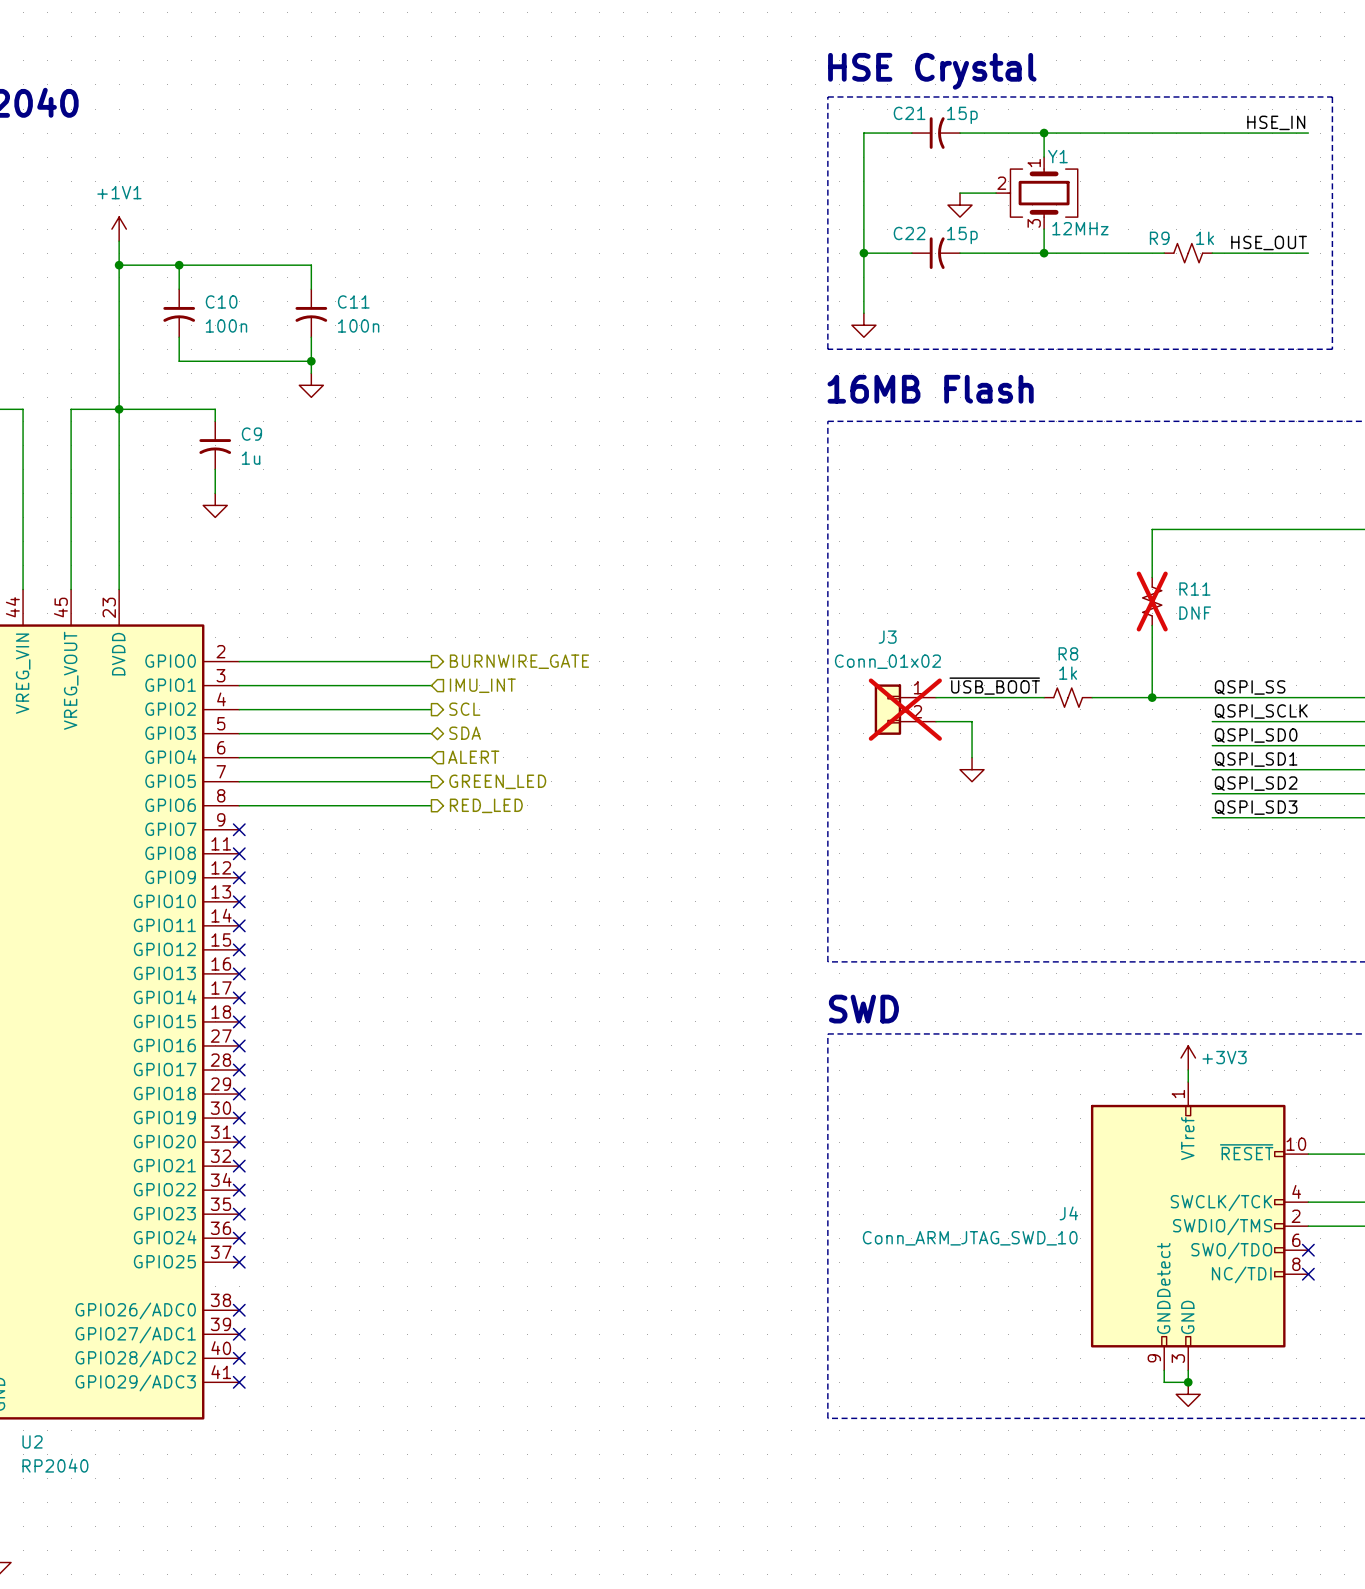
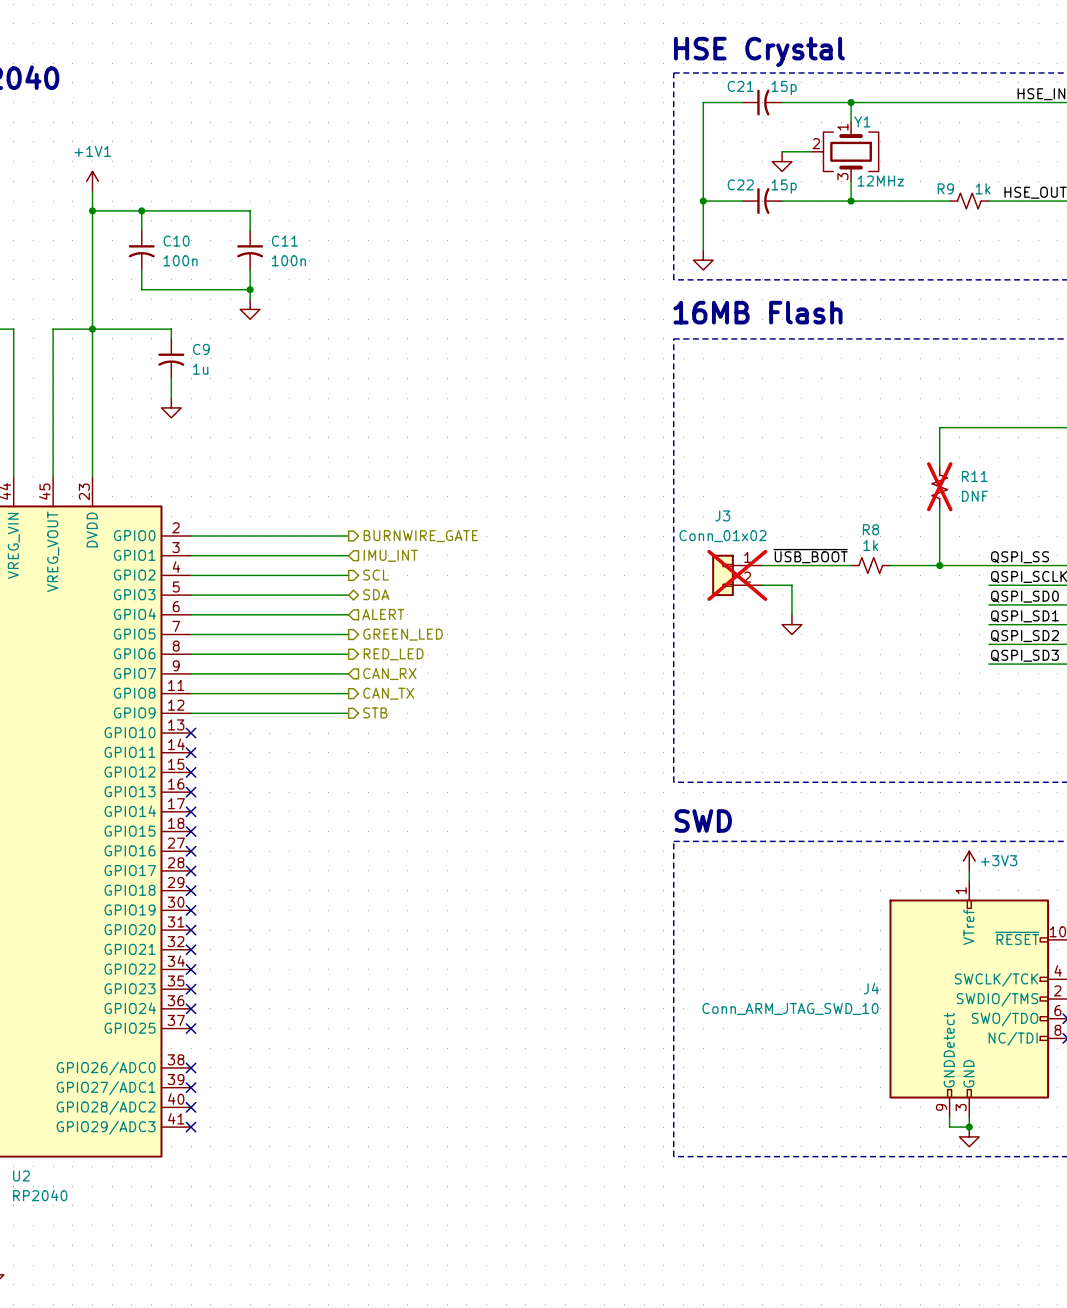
wire: none -> (191, 673) (348, 673)
no-connect mark: (239, 829) -> none
hierarchical label: none -> CAN_RX (389, 674)
wire: none -> (191, 693) (348, 693)
no-connect mark: (239, 853) -> none
hierarchical label: none -> CAN_TX (388, 693)
wire: none -> (191, 713) (348, 713)
no-connect mark: (239, 877) -> none
hierarchical label: none -> STB (375, 712)

